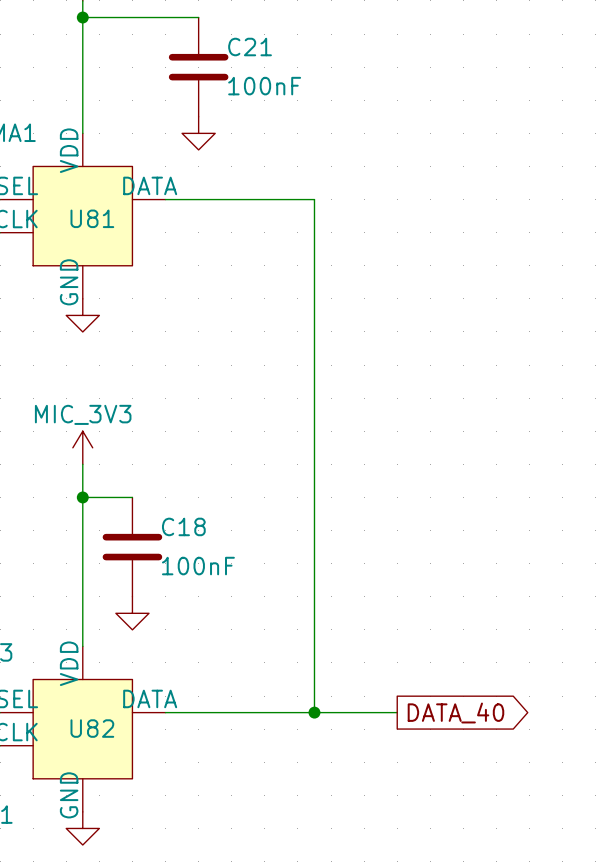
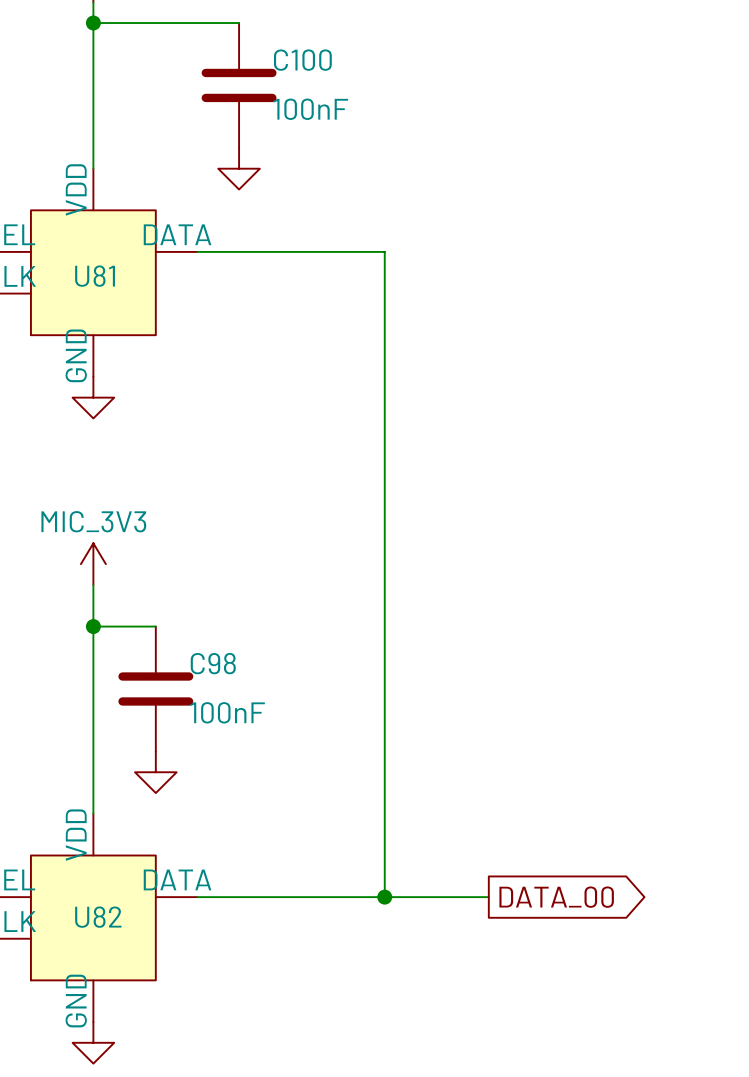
C21 name: C21 (250, 47) -> C100 (302, 60)
C18 name: C18 (183, 526) -> C98 (213, 663)
global label: DATA_40 (455, 713) -> DATA_00 (556, 897)

